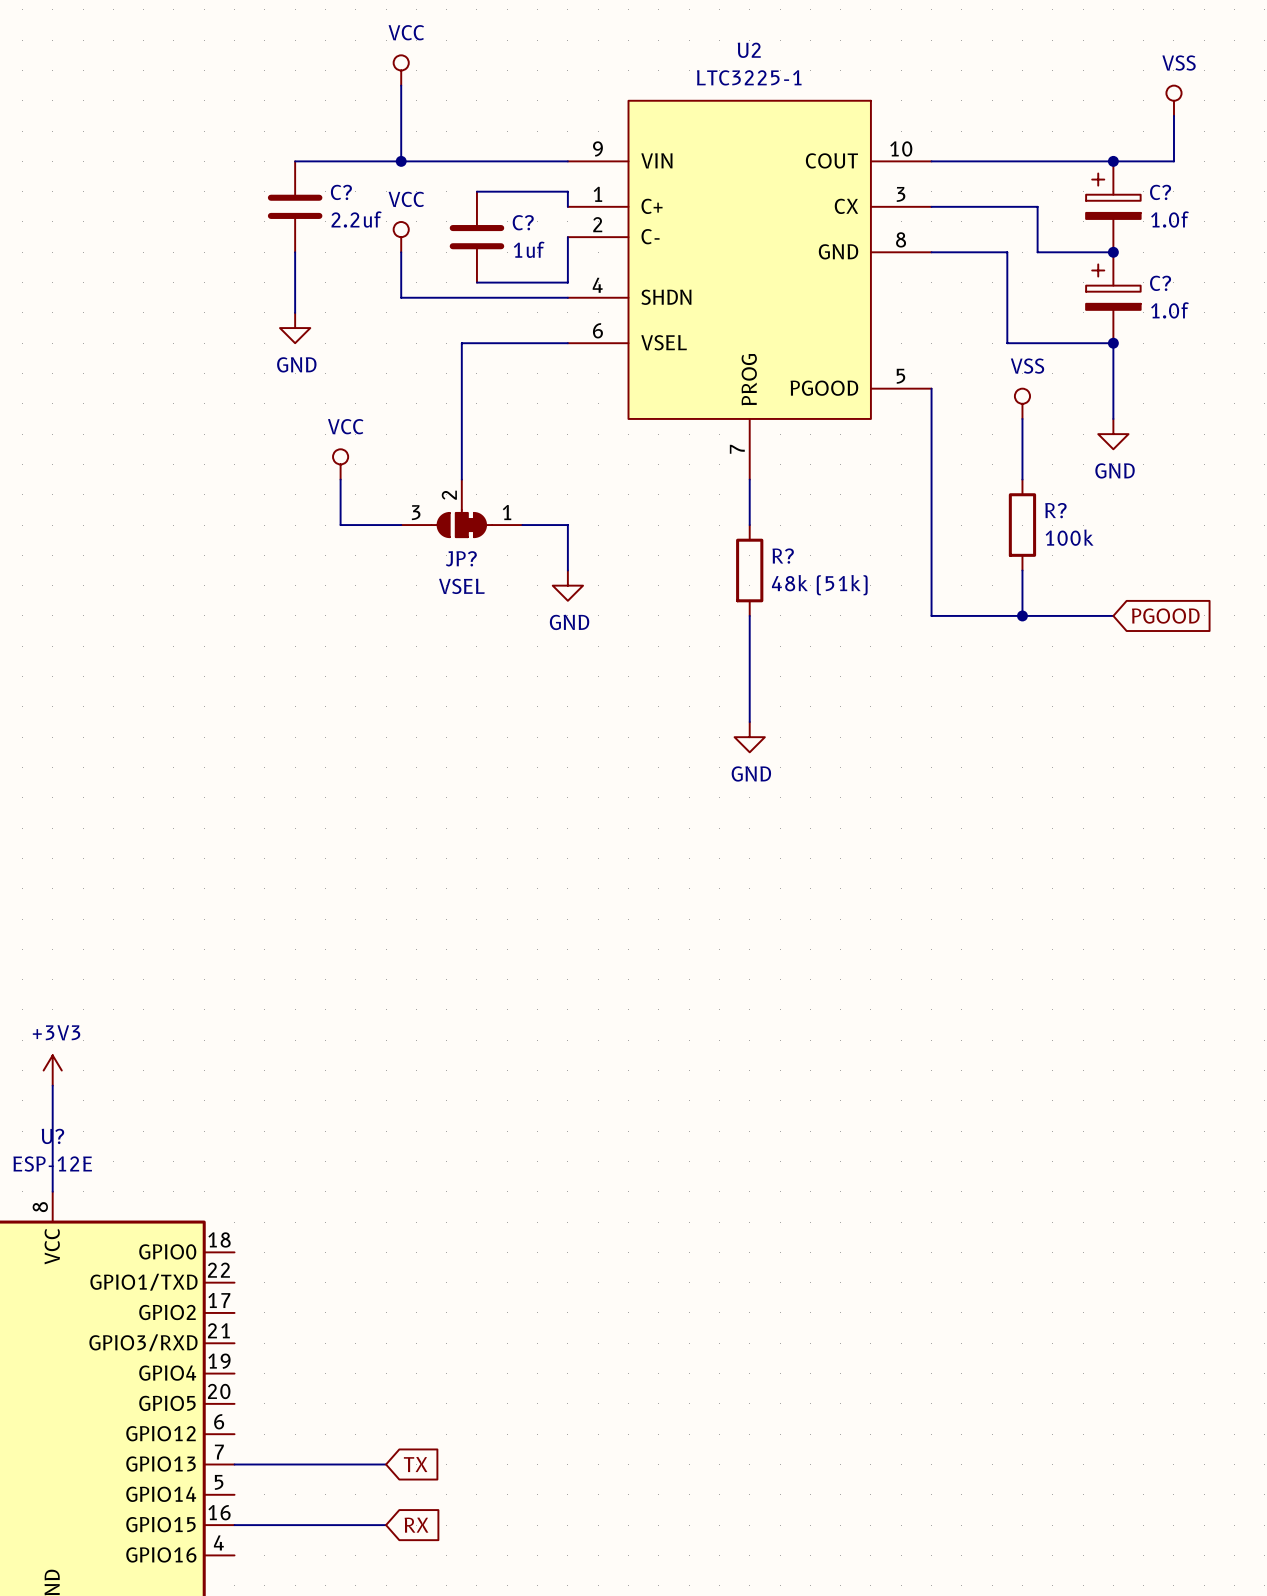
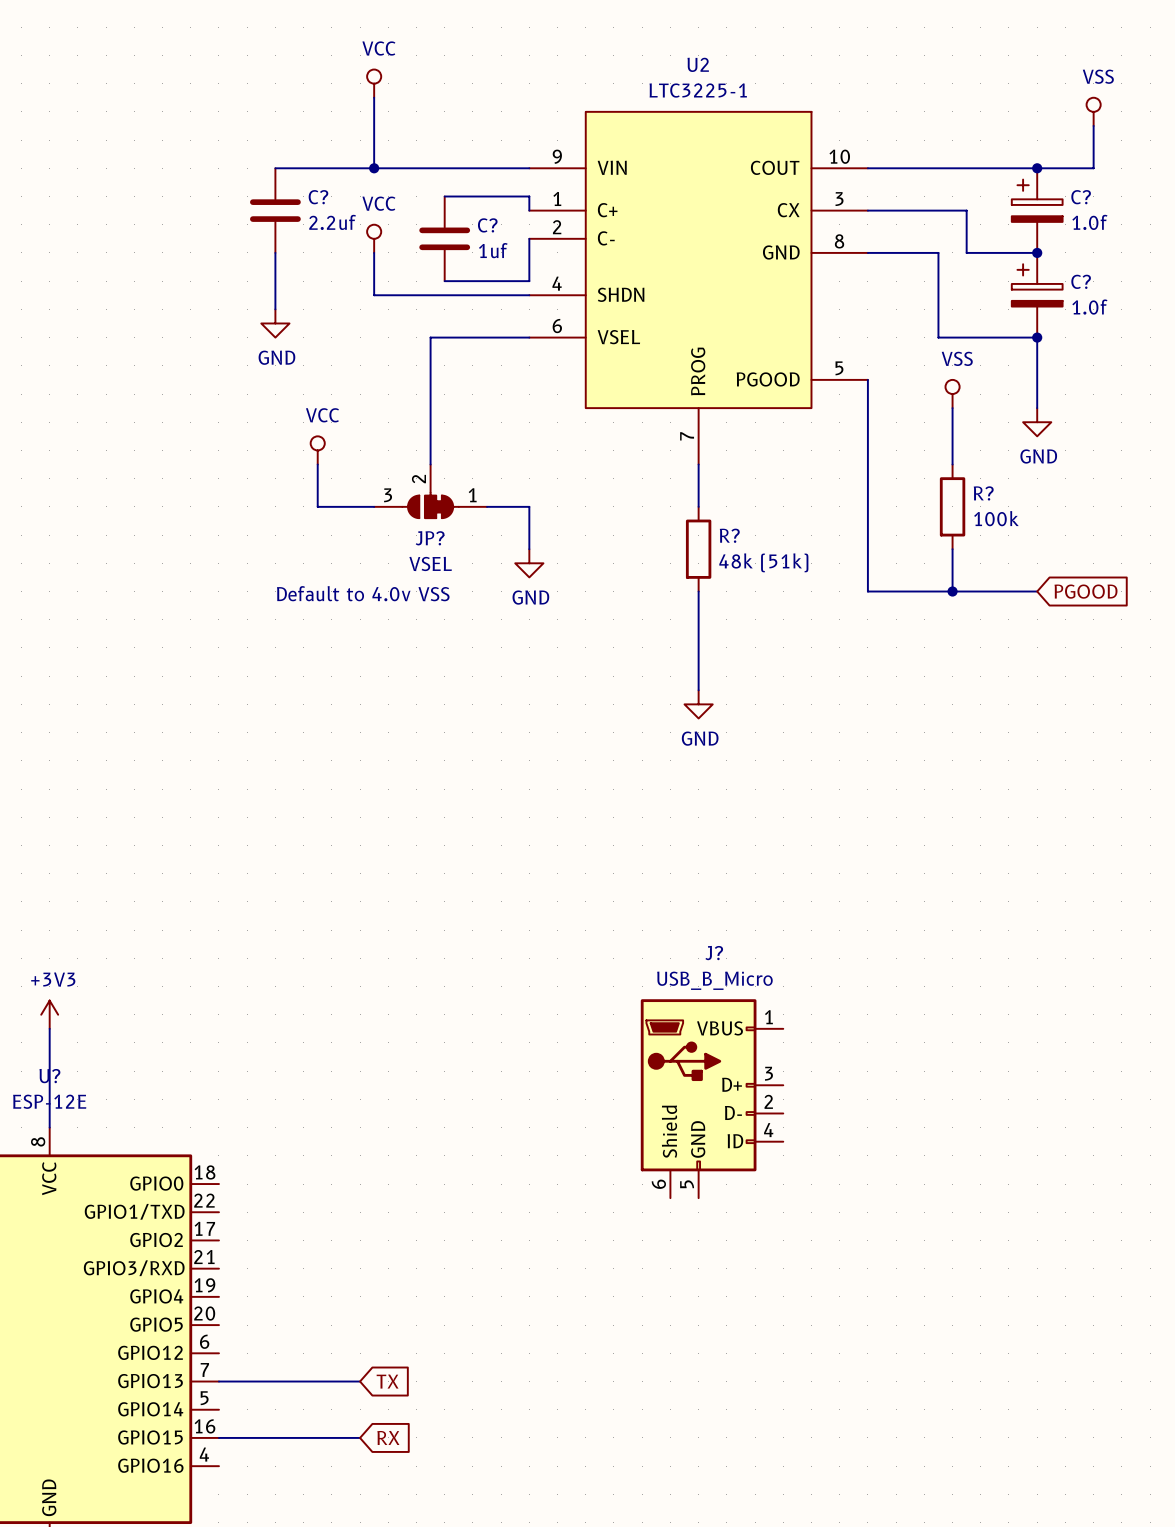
text: none -> Default to 4.0v VSS (363, 593)
J?: none -> USB_B_Micro (712, 1098)

